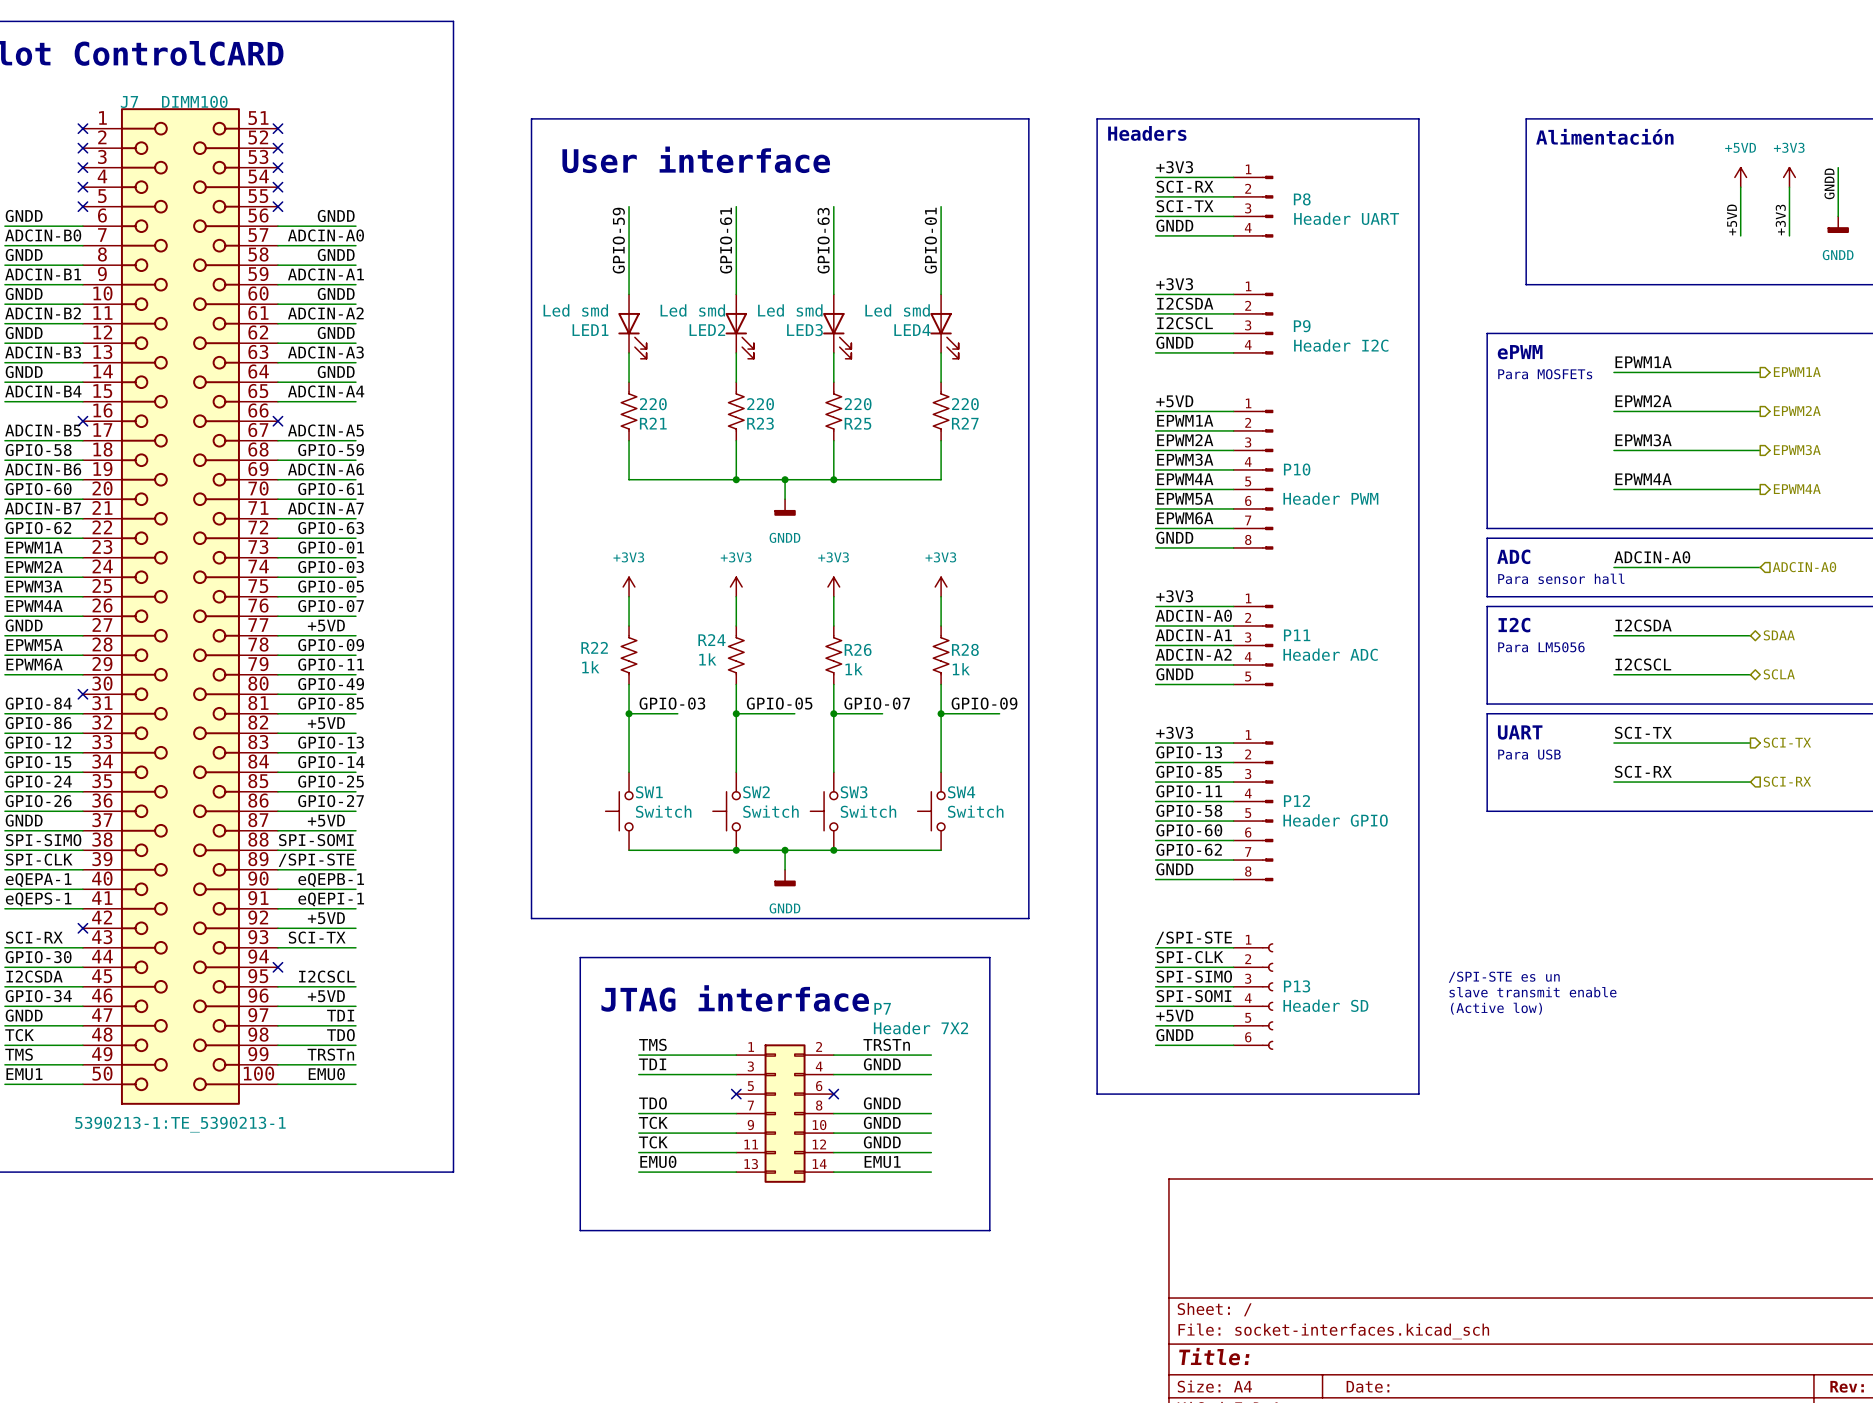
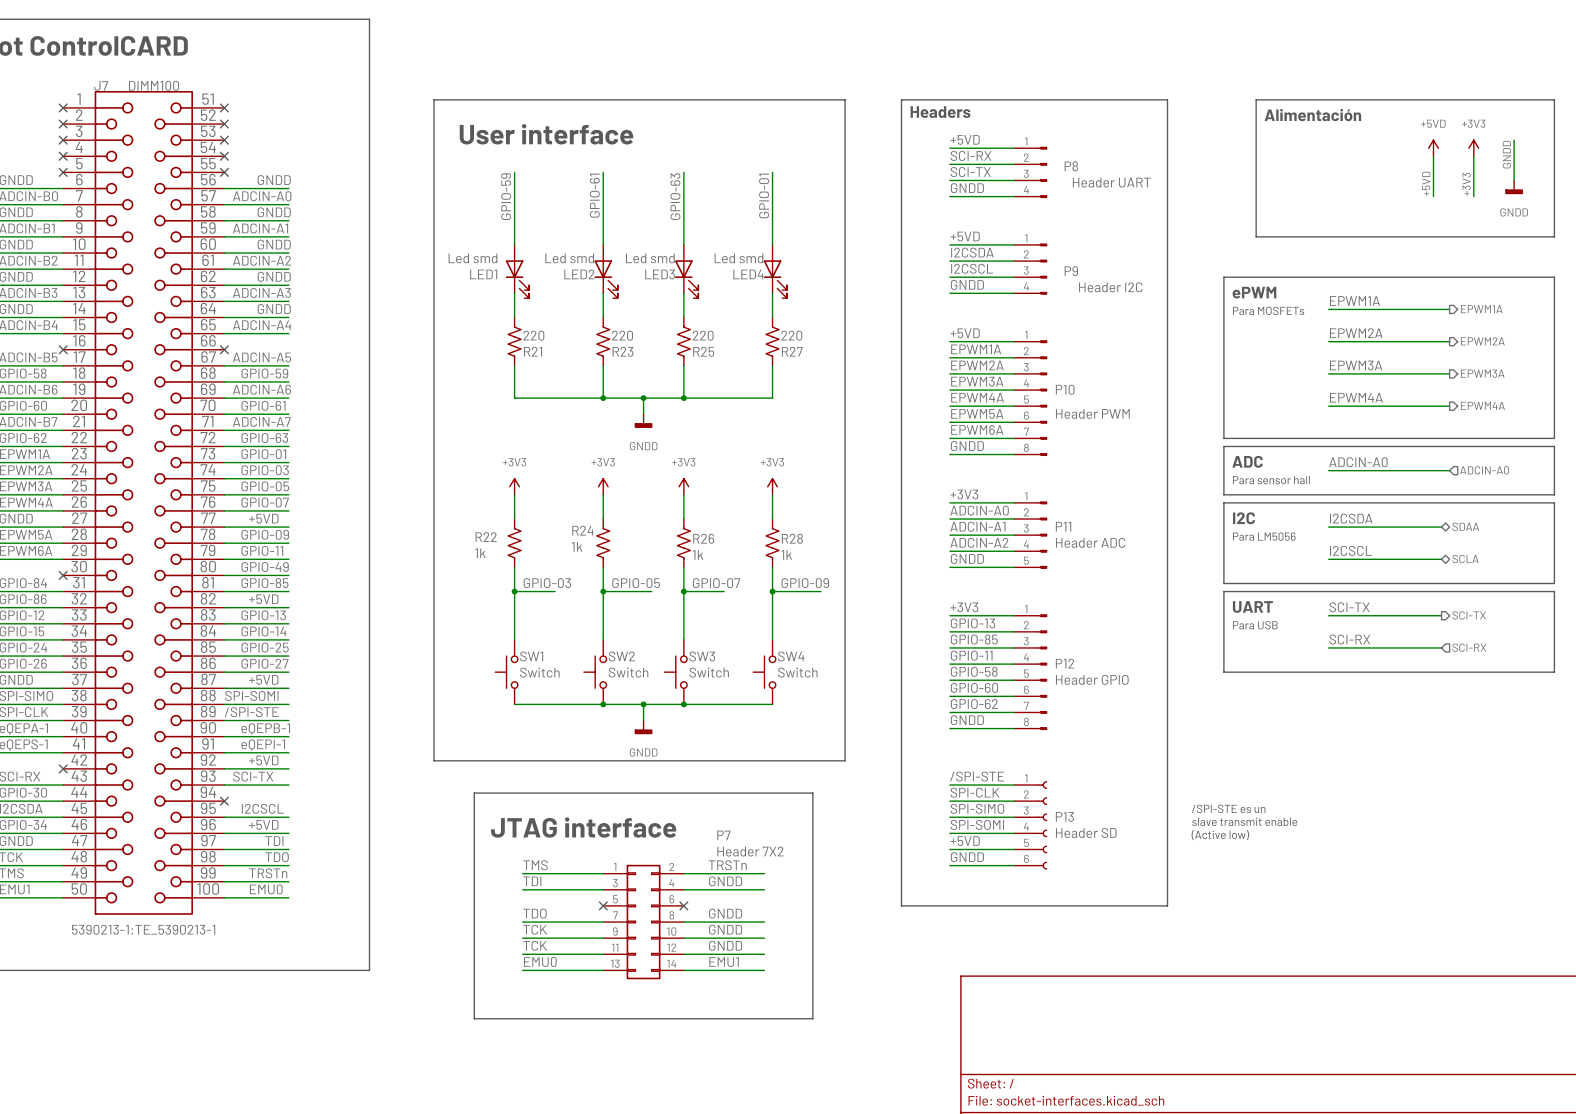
label: +3V3 (1174, 167) -> +5VD (965, 139)
label: +3V3 (1174, 284) -> +5VD (965, 236)

